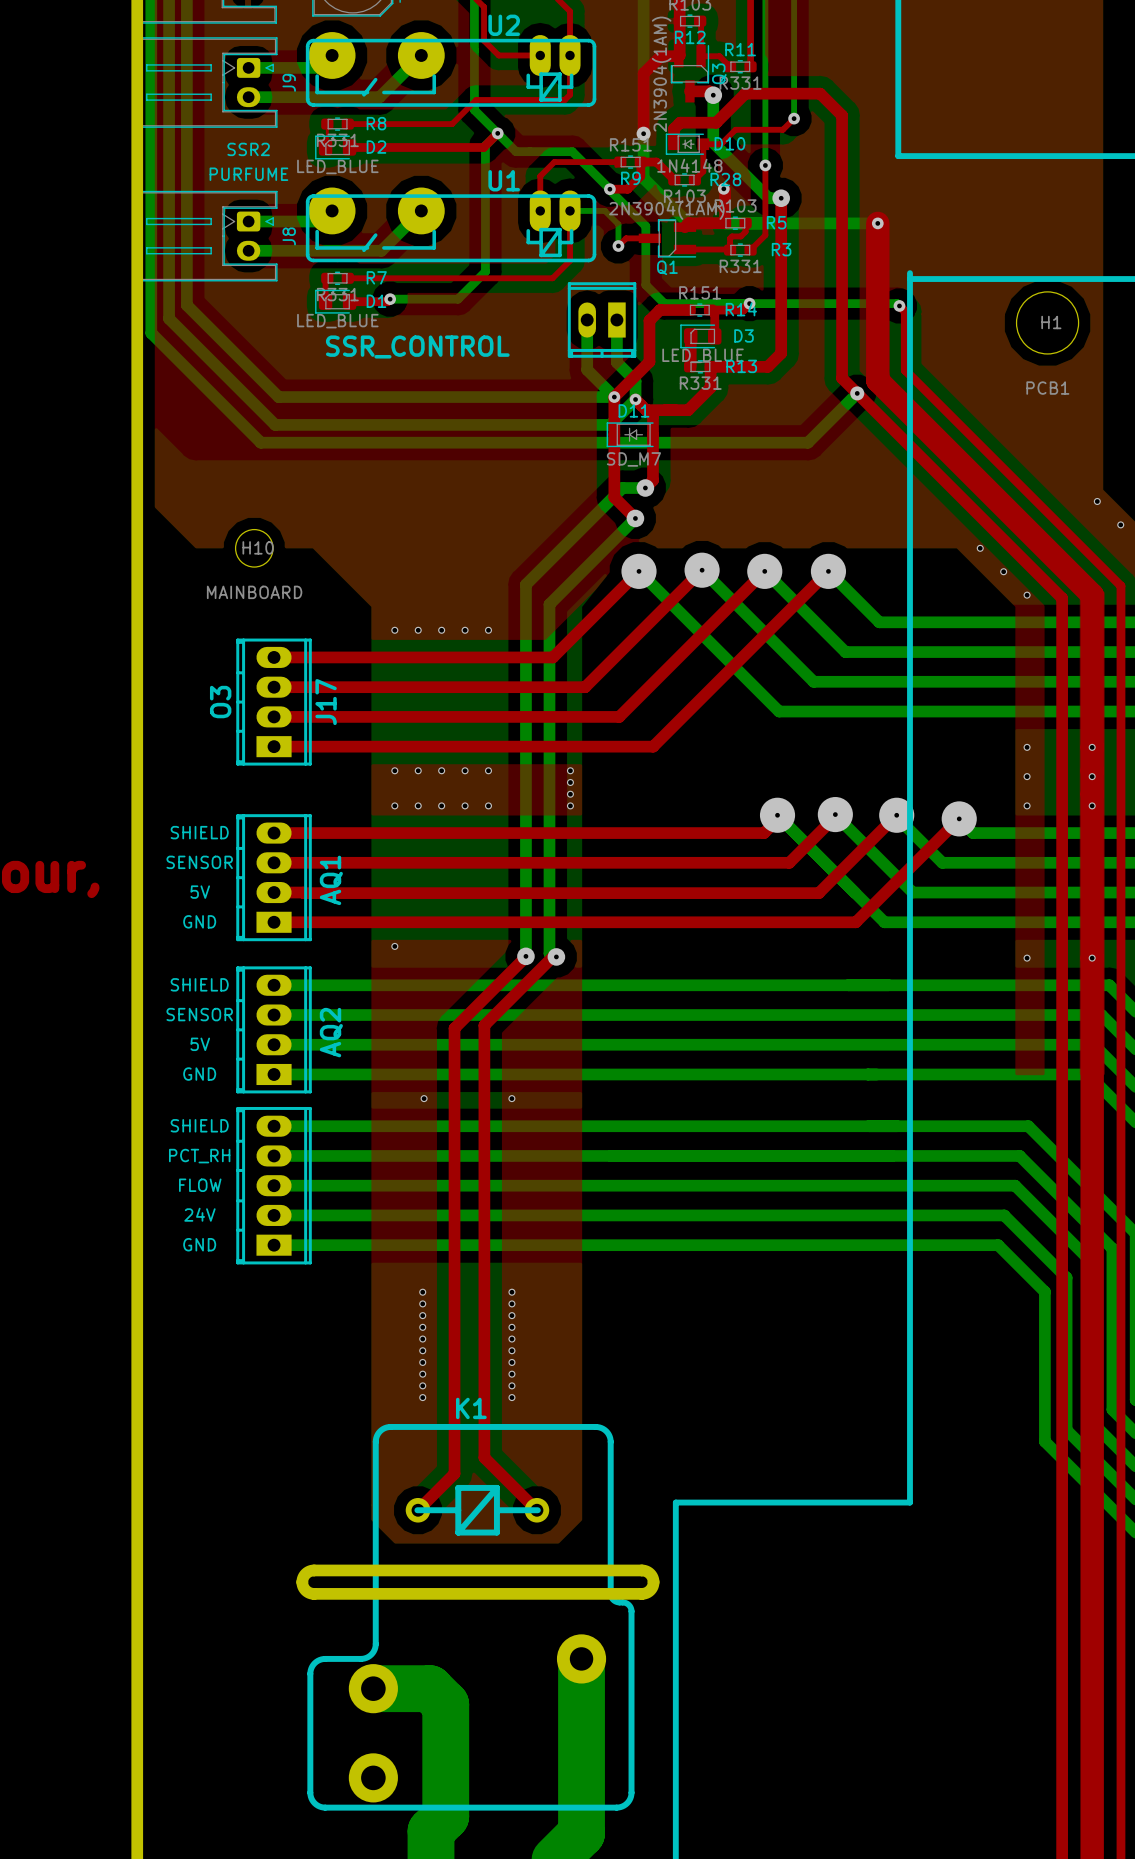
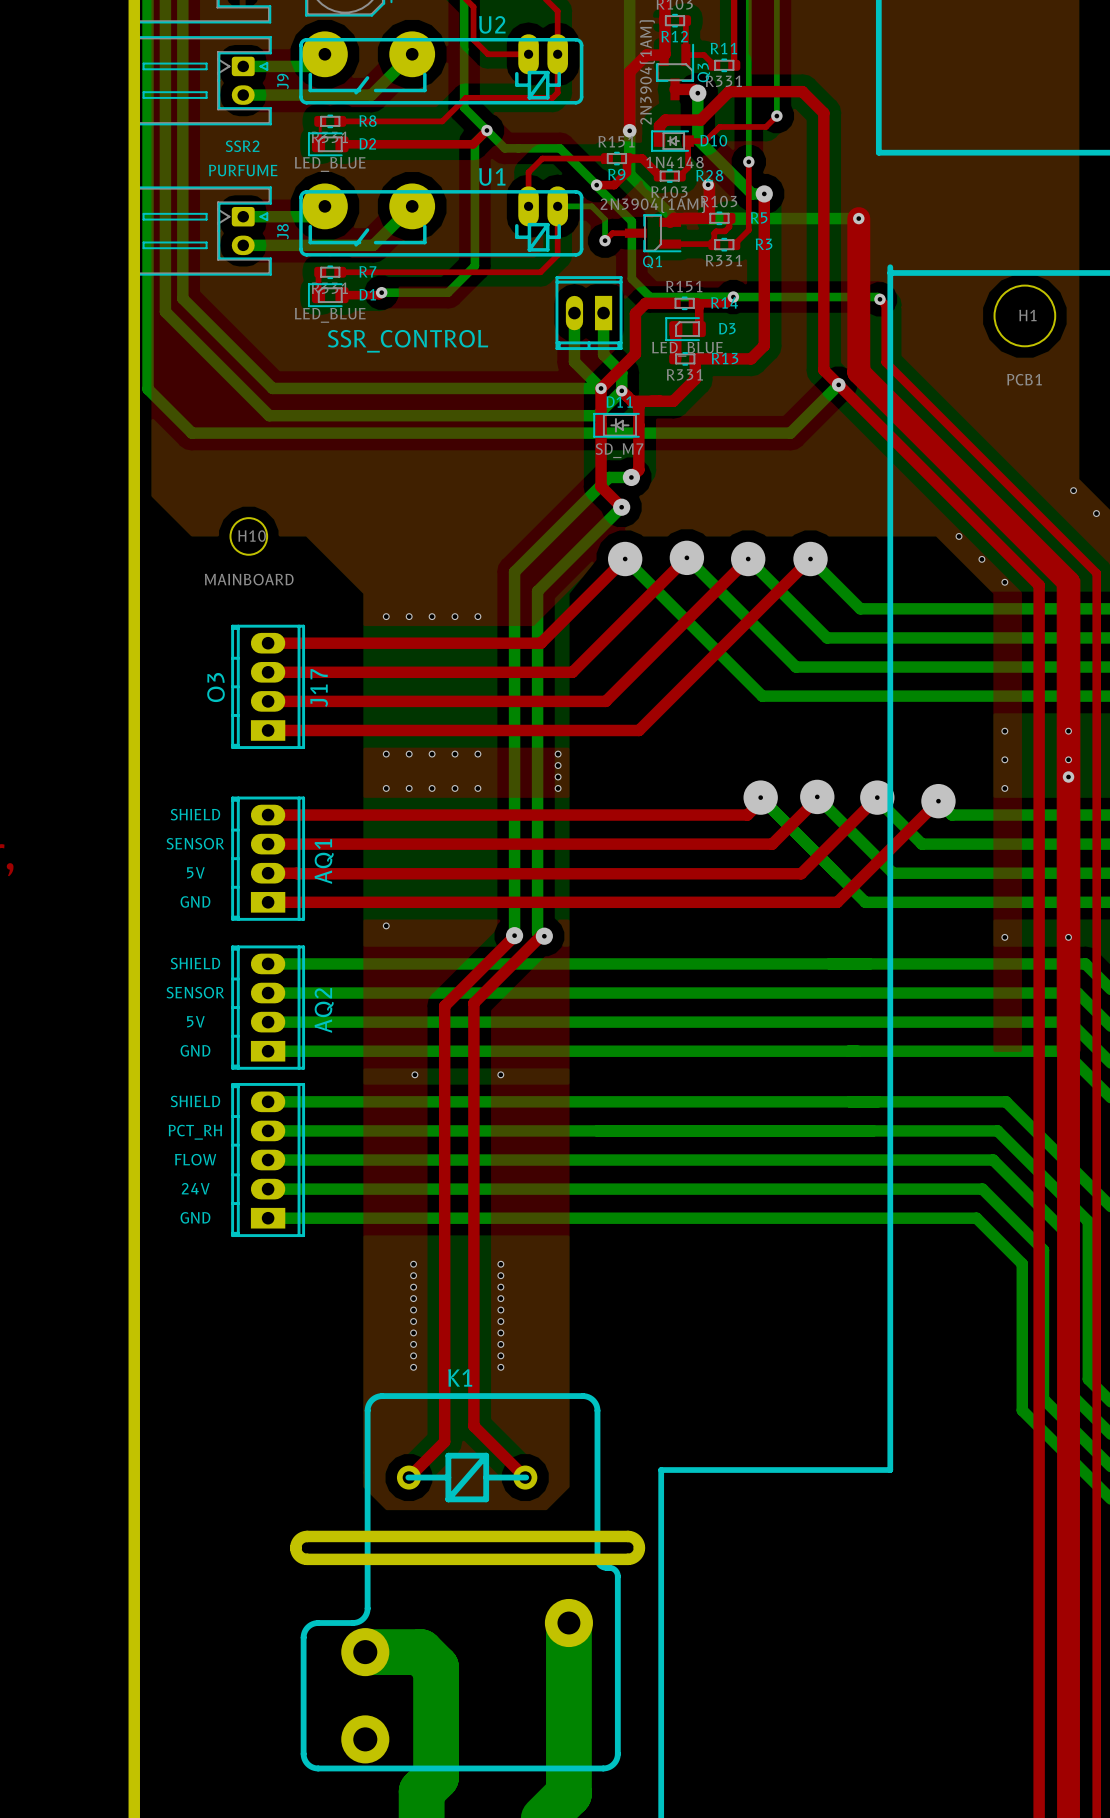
bottom track: (151, 333) (260, 442) -> (148, 325) (148, 389) (191, 433) (255, 433)
via: none -> (1068, 776)
via: (1092, 805) -> none

